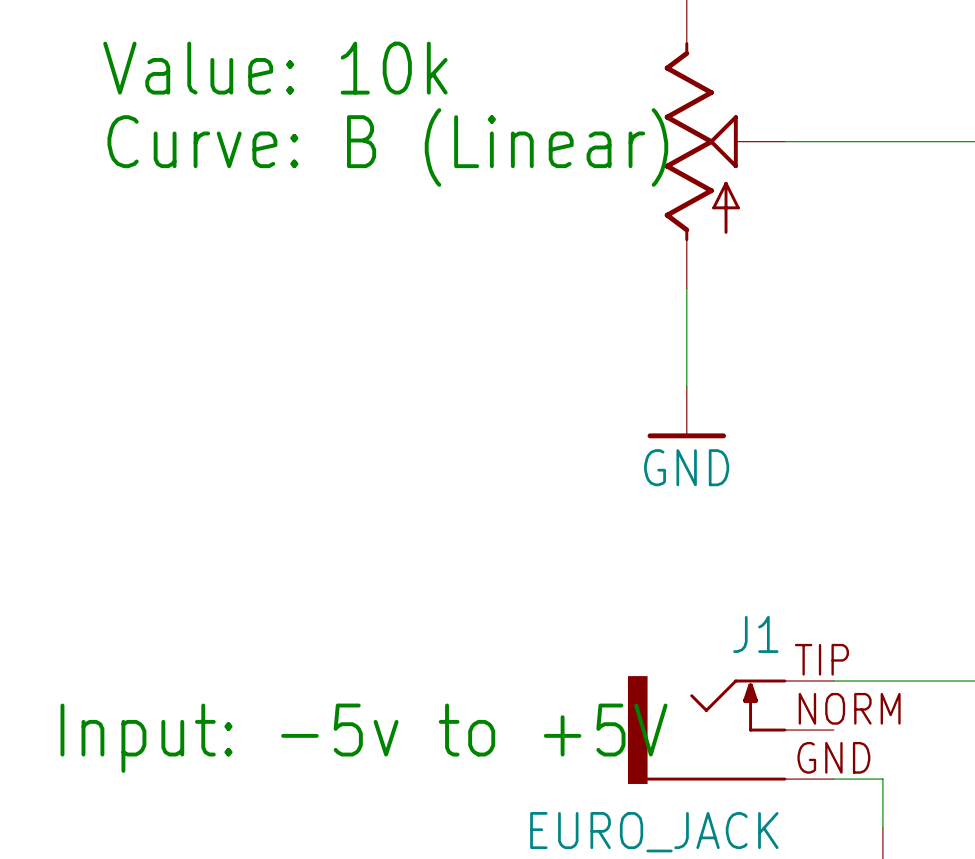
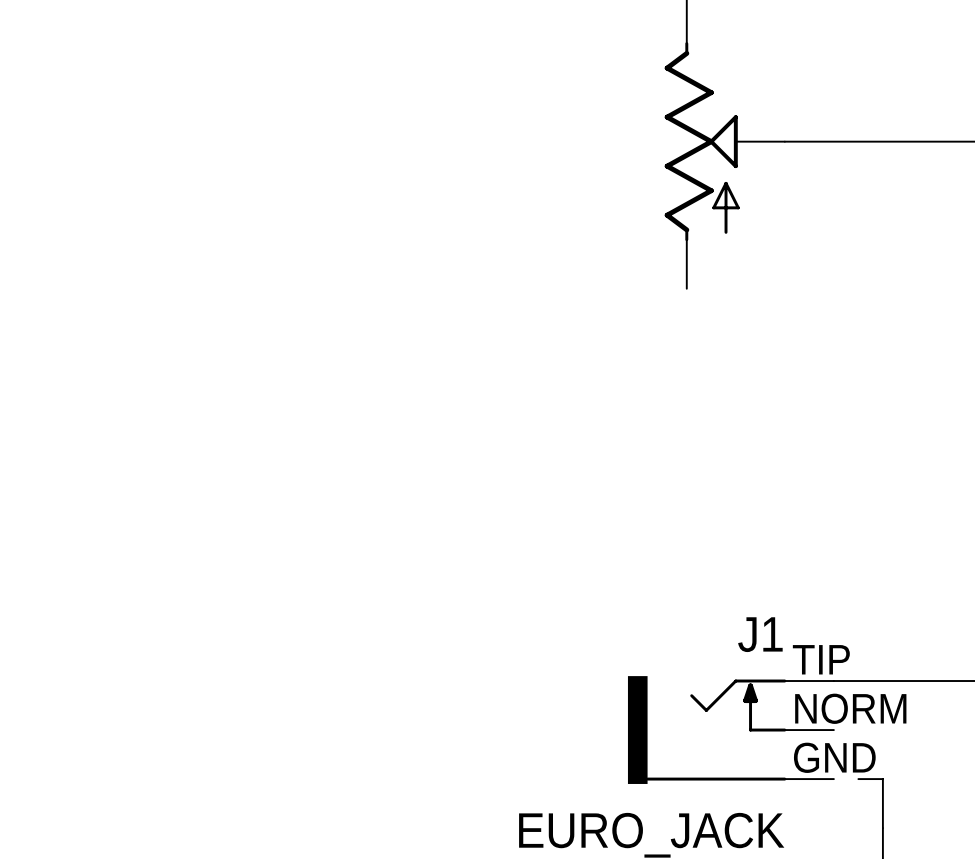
text: Value: 10k (275, 68) -> none
text: Curve: B (Linear) (387, 147) -> none
wire: (686, 288) (686, 386) -> none
power symbol: GND (686, 412) -> none
text: Input: -5v to +5V (364, 738) -> none
wire: (833, 779) (858, 779) -> none

